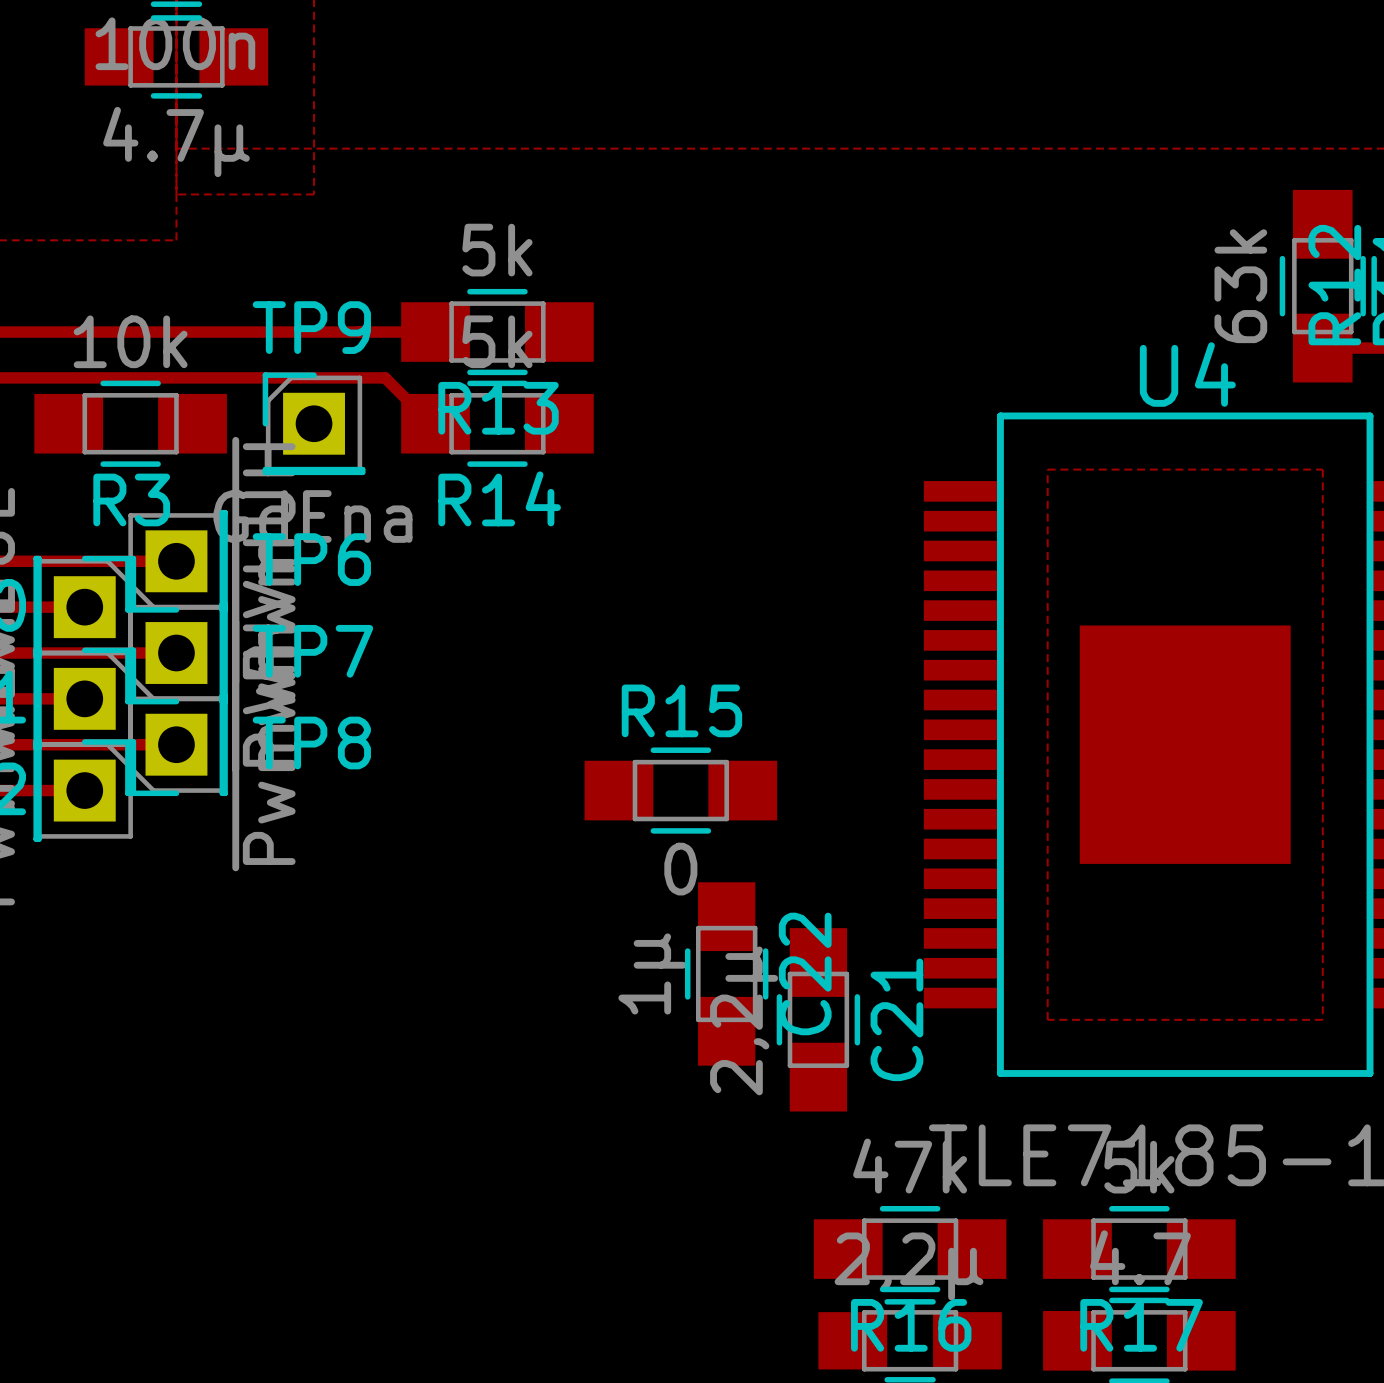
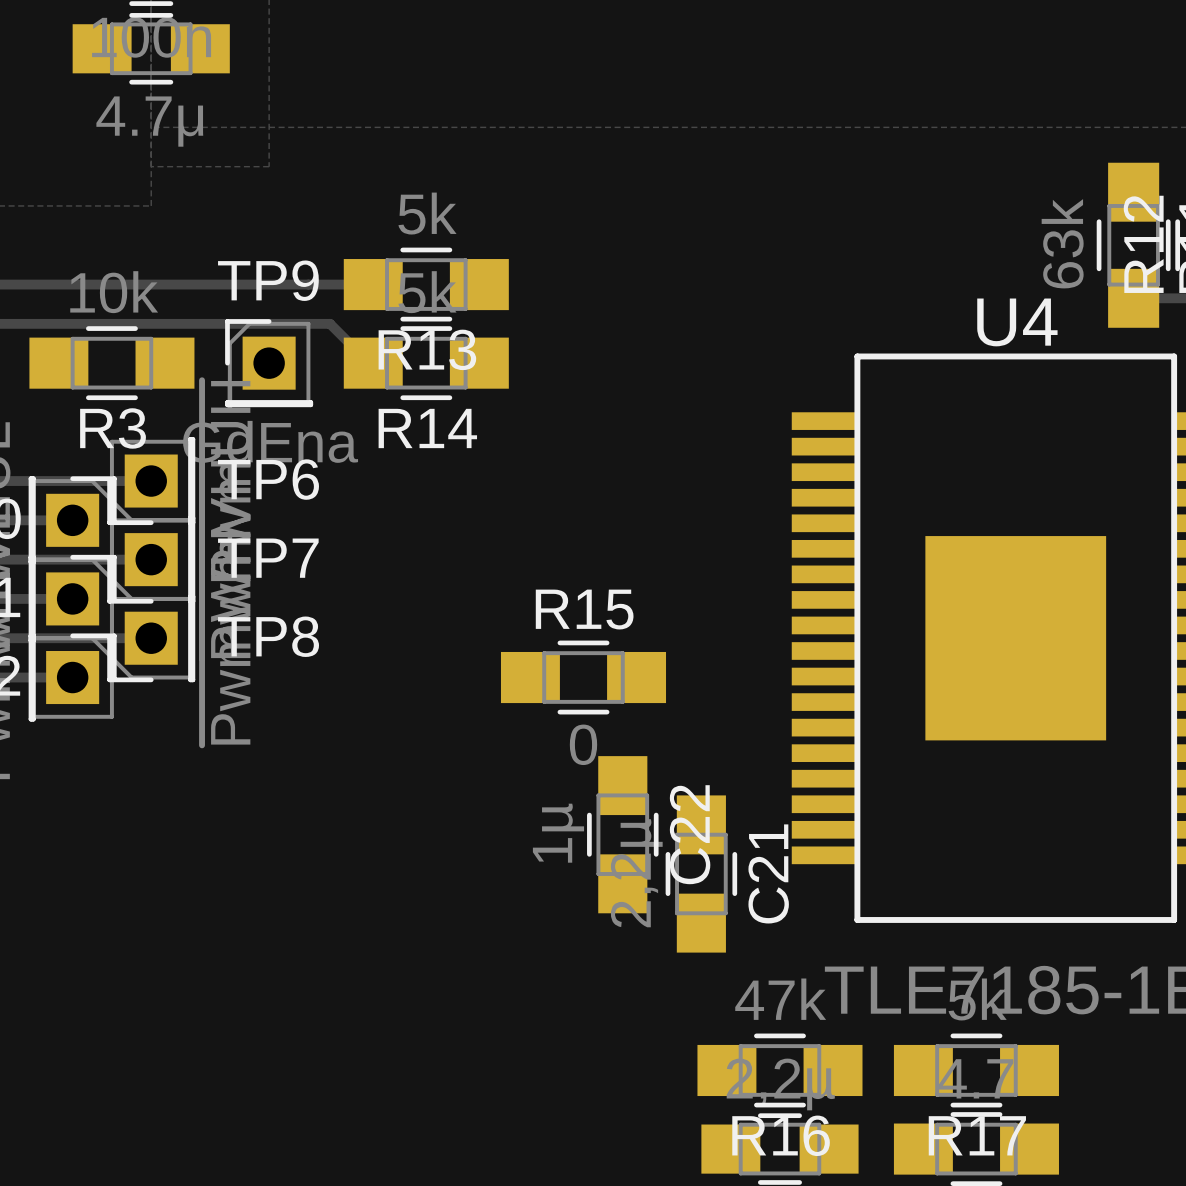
zone outline: (1047, 469) (1322, 469) (1322, 1019) (1047, 1019) (1047, 469) -> none

